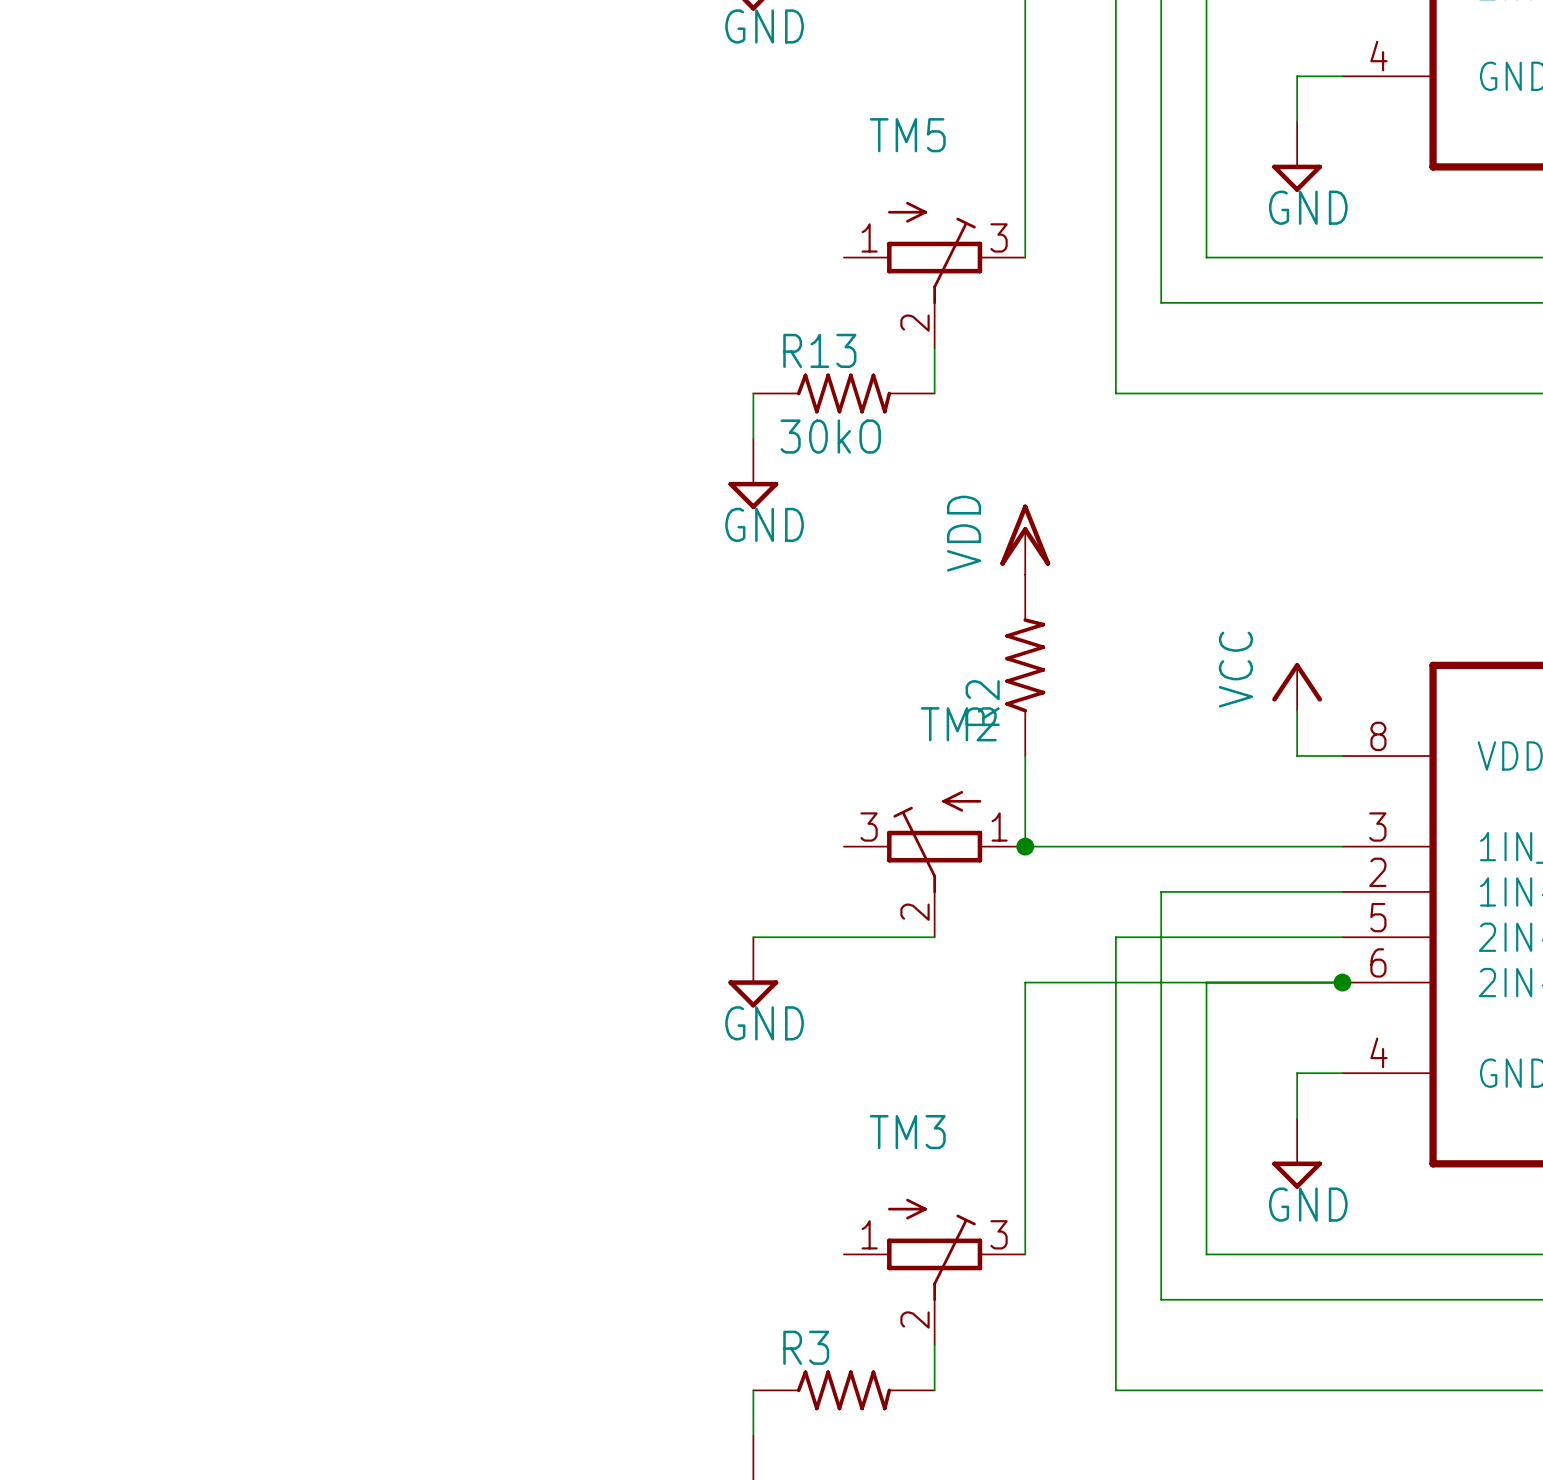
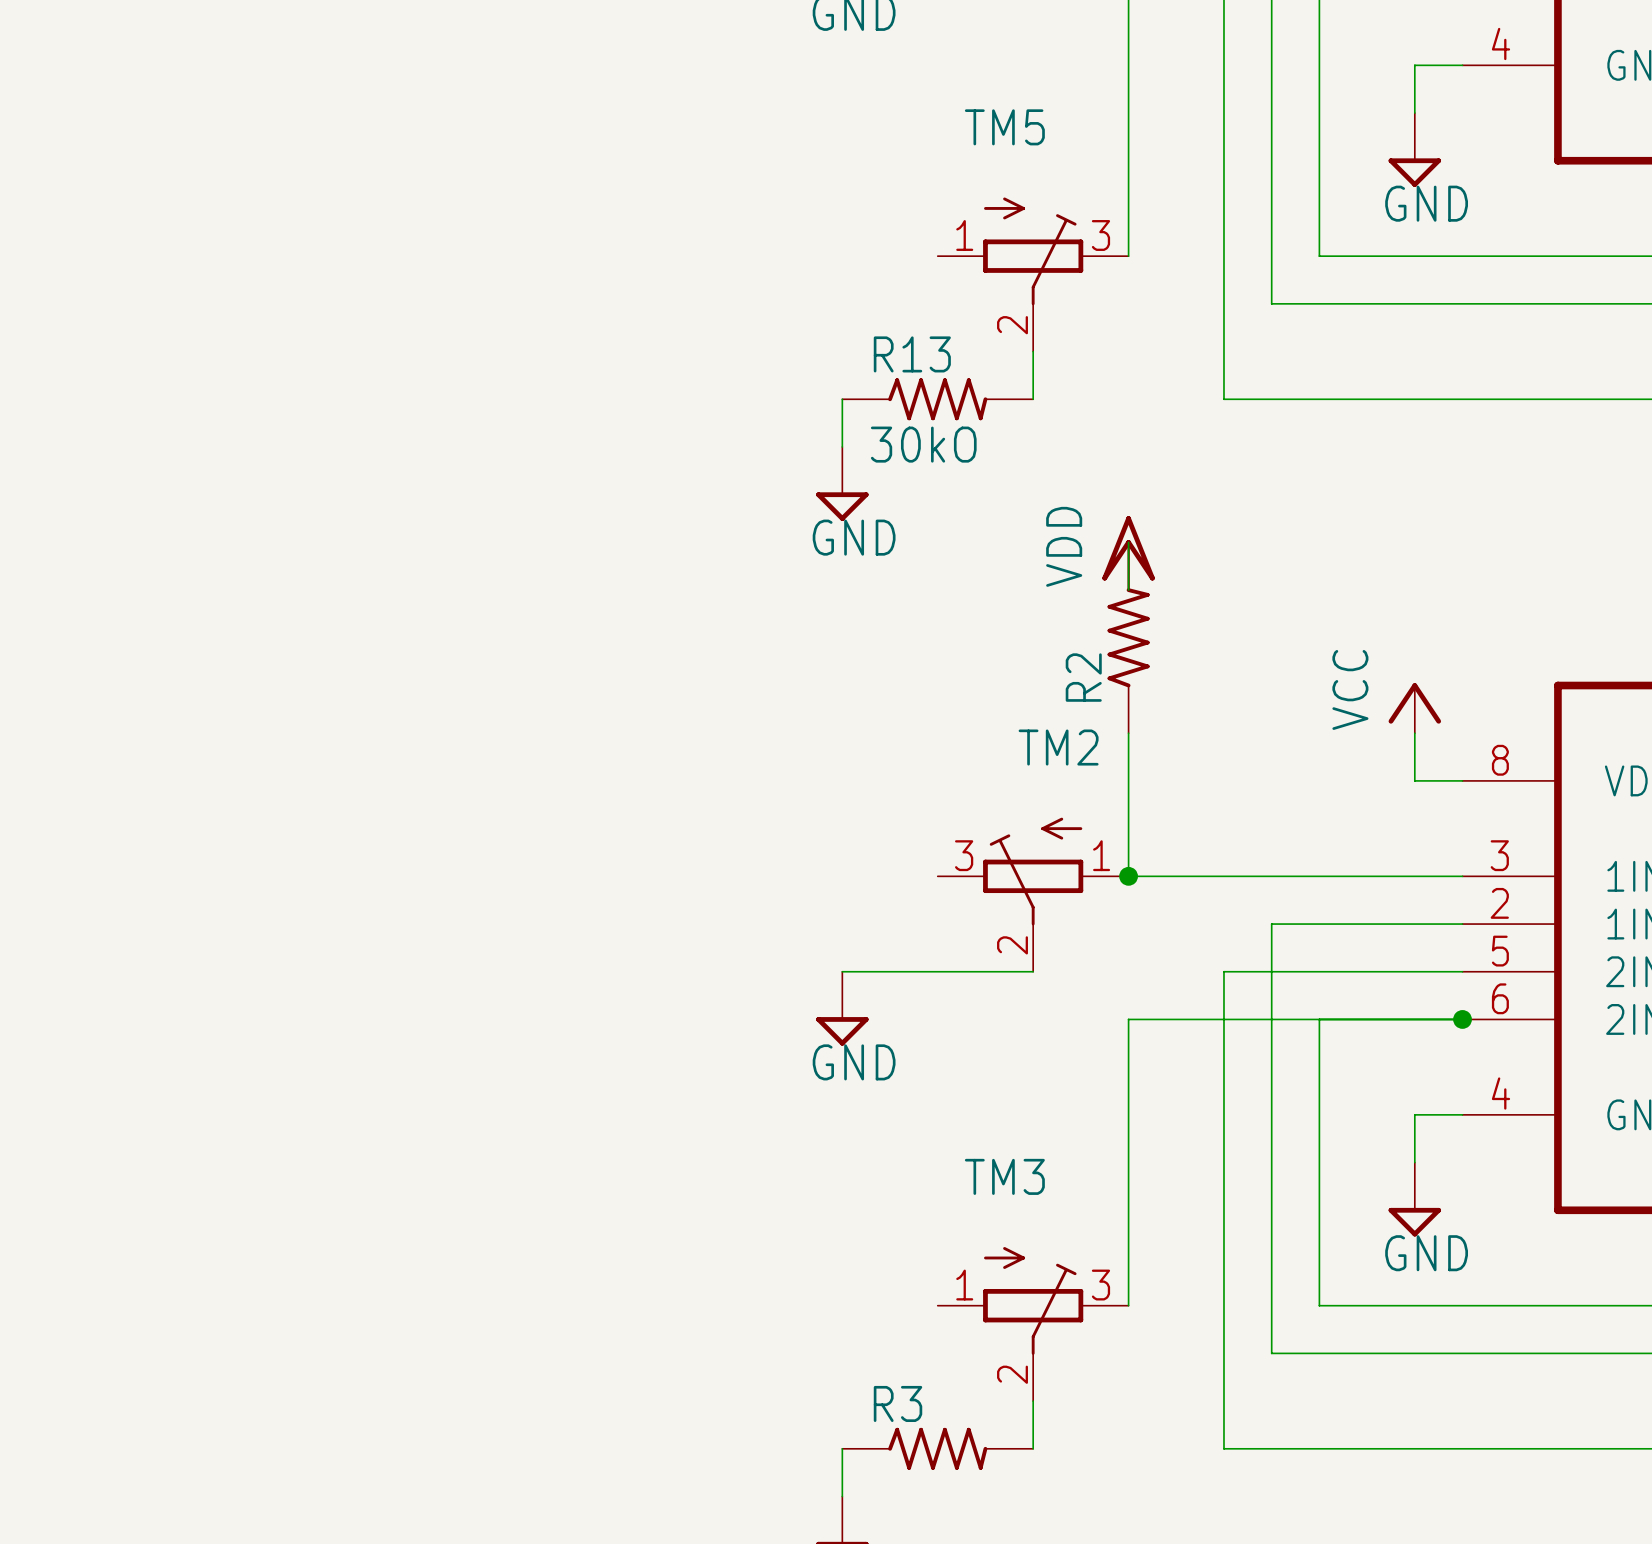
R2 position: (1025, 665) -> (1128, 637)

